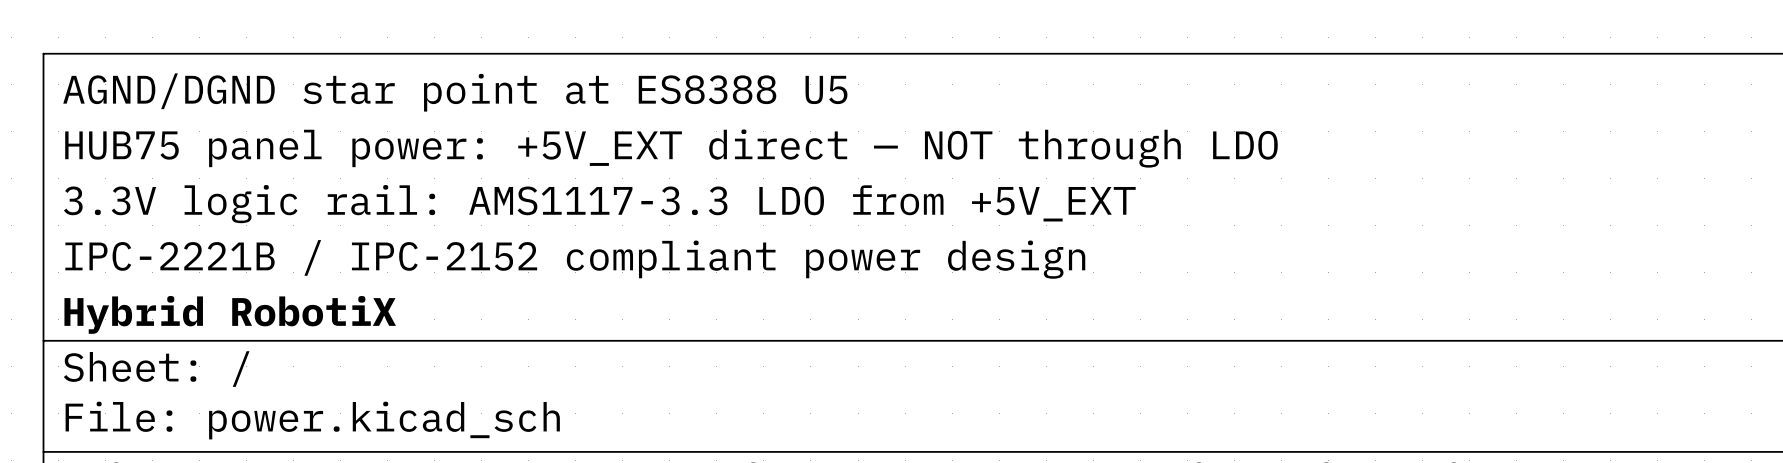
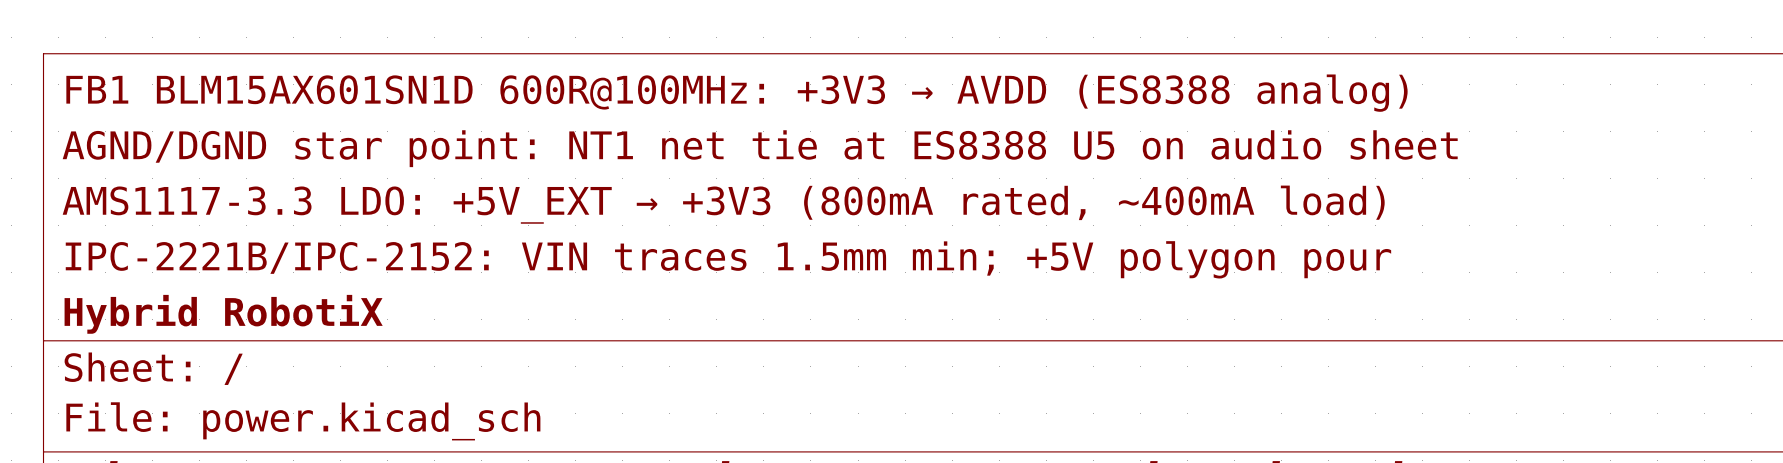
title block: AGND/DGND star point at ES8388 U5 (455, 92) -> FB1 BLM15AX601SN1D 600R@100MHz: +3V3 → AVDD (ES8388 analog) (736, 93)
title block: HUB75 panel power: +5V_EXT direct — NOT through LDO (671, 148) -> AGND/DGND star point: NT1 net tie at ES8388 U5 on audio sheet (760, 148)
title block: 3.3V logic rail: AMS1117-3.3 LDO from +5V_EXT (599, 204) -> AMS1117-3.3 LDO: +5V_EXT → +3V3 (800mA rated, ~400mA load) (723, 204)
title block: IPC-2221B / IPC-2152 compliant power design (575, 259) -> IPC-2221B/IPC-2152: VIN traces 1.5mm min; +5V polygon pour (728, 259)

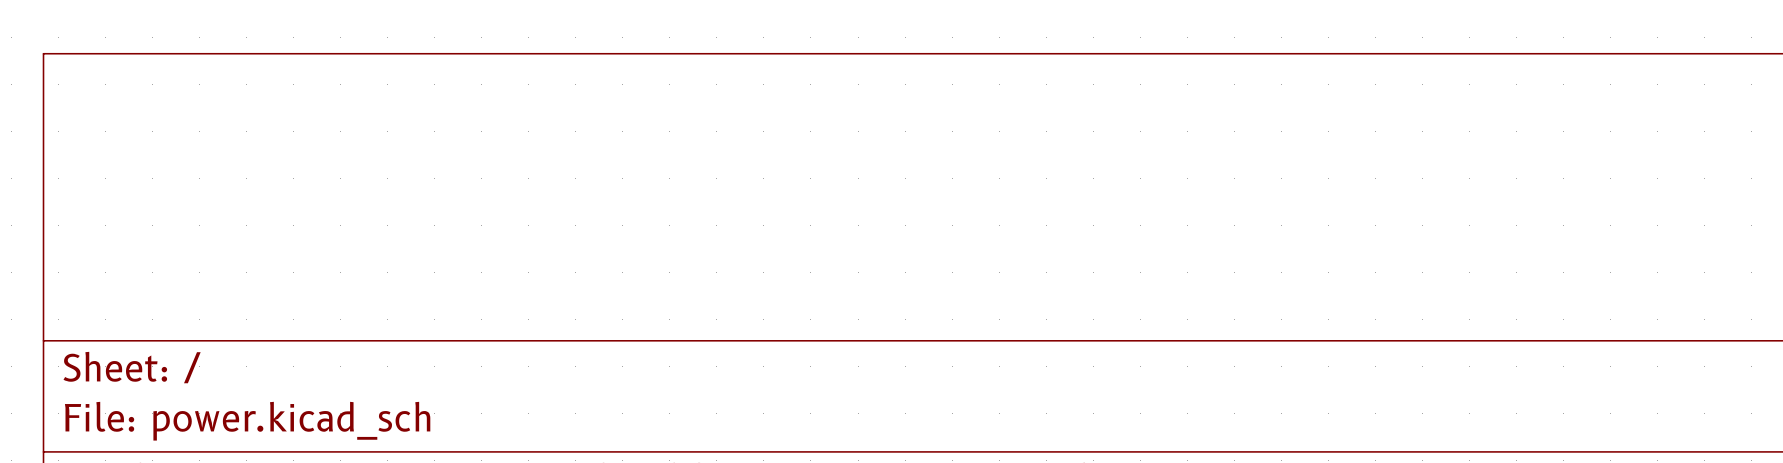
title block: FB1 BLM15AX601SN1D 600R@100MHz: +3V3 → AVDD (ES8388 analog) (736, 93) -> none
title block: AGND/DGND star point: NT1 net tie at ES8388 U5 on audio sheet (760, 148) -> none
title block: AMS1117-3.3 LDO: +5V_EXT → +3V3 (800mA rated, ~400mA load) (723, 204) -> none
title block: IPC-2221B/IPC-2152: VIN traces 1.5mm min; +5V polygon pour (728, 259) -> none
title block: Hybrid RobotiX (223, 314) -> none

